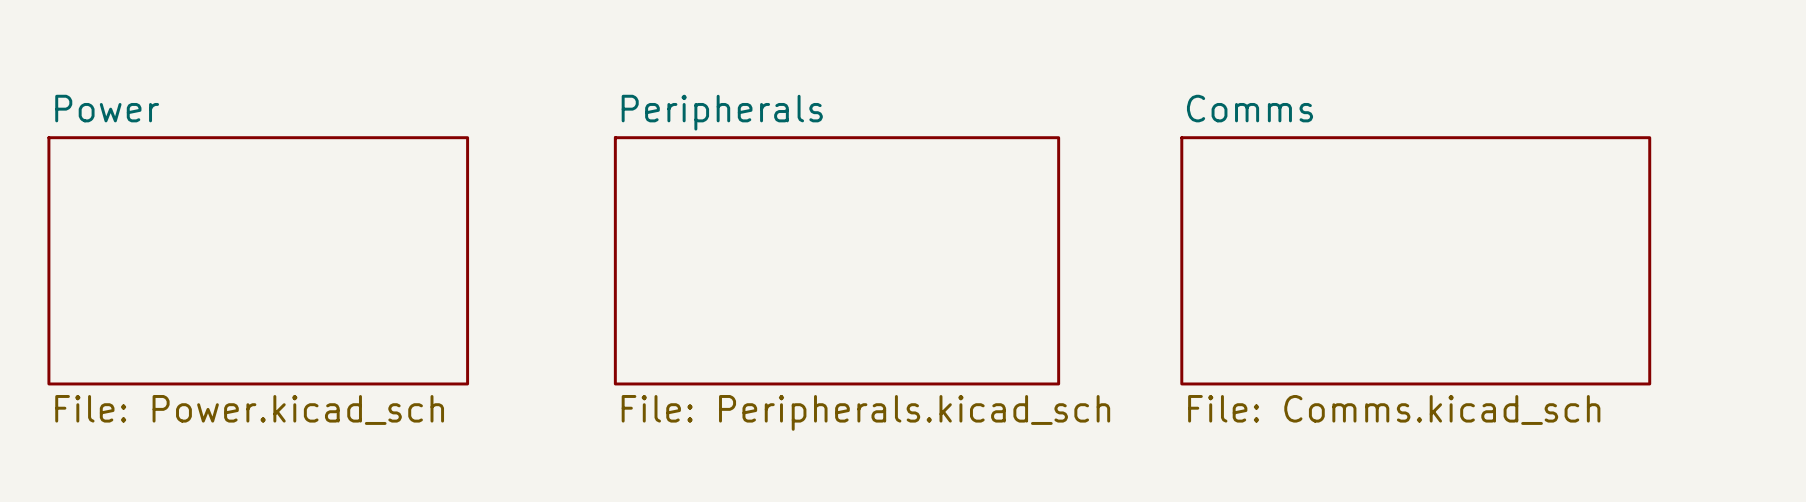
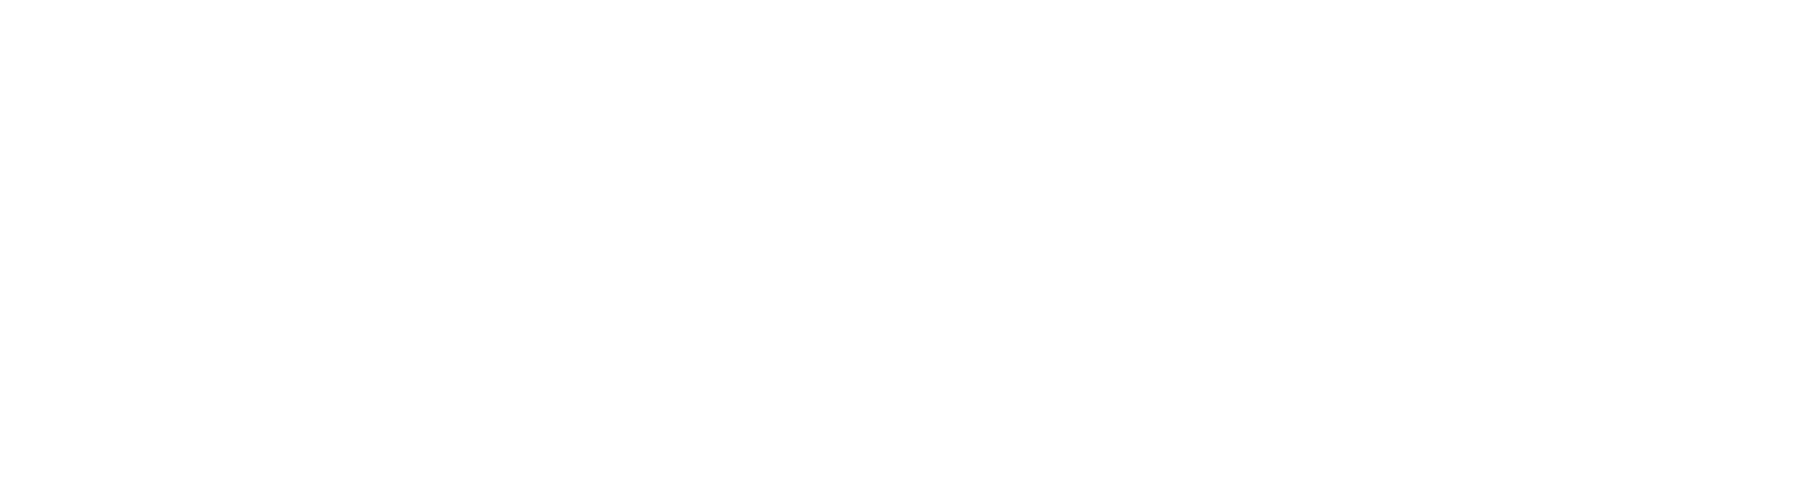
sheet Power: File: Power.kicad_sch (258, 260) -> none
sheet Peripherals: File: Peripherals.kicad_sch (837, 260) -> none
sheet Comms: File: Comms.kicad_sch (1415, 260) -> none

